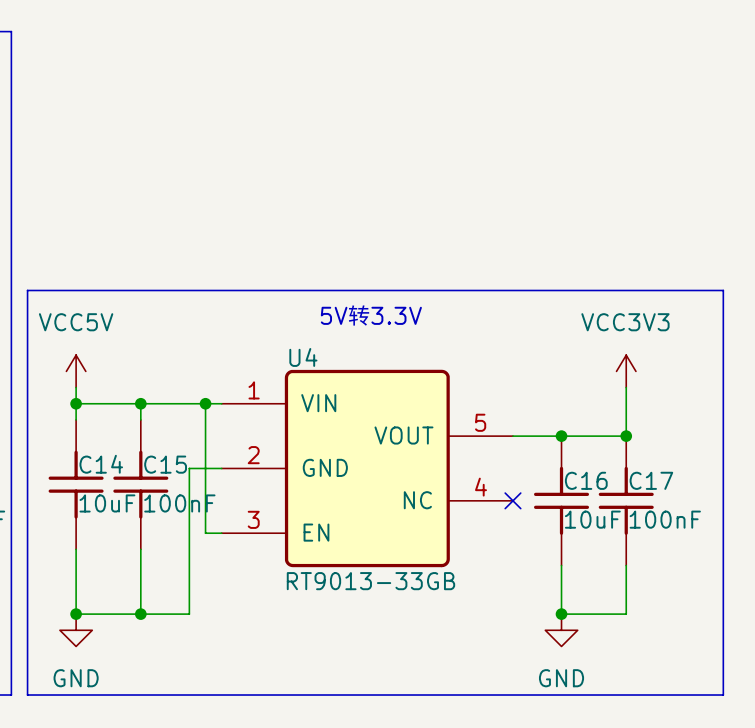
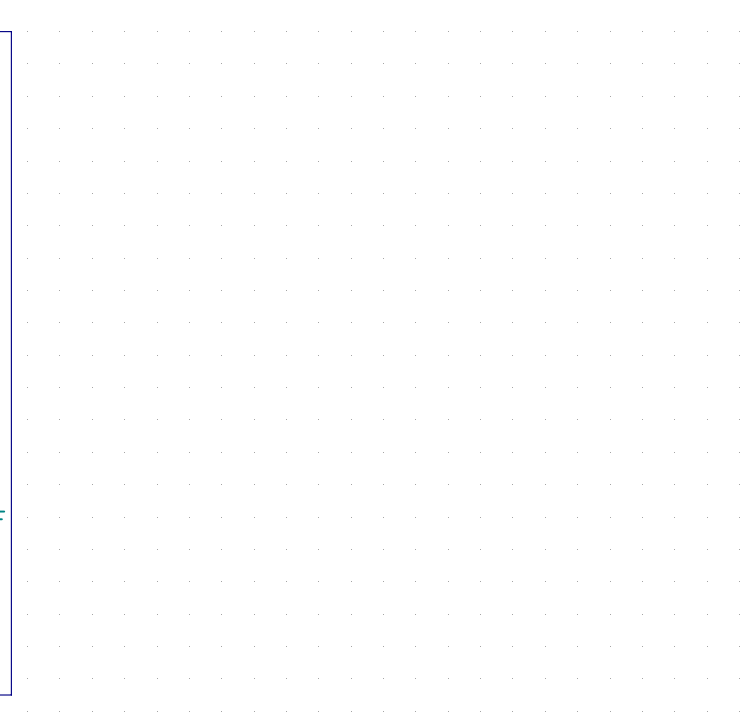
line: (27, 290) (723, 290) (723, 695) (27, 695) (27, 290) -> none
text: 5V转3.3V (371, 315) -> none
power symbol: VCC5V (76, 371) -> none
power symbol: VCC3V3 (626, 371) -> none
wire: (76, 387) (76, 419) -> none
wire: (626, 387) (626, 436) (512, 436) -> none
wire: (76, 403) (221, 403) -> none
junction: (76, 403) -> none
wire: (140, 403) (140, 419) -> none
junction: (140, 403) -> none
wire: (205, 403) (205, 533) (221, 533) -> none
junction: (205, 403) -> none
junction: (561, 436) -> none
junction: (626, 436) -> none
wire: (221, 468) (189, 468) (189, 614) (76, 614) (76, 549) -> none
U4: RT9013-33GB (367, 468) -> none
C14: 10uF (76, 484) -> none
C15: 100nF (140, 484) -> none
no-connect mark: (512, 500) -> none
C16: 10uF (561, 500) -> none
C17: 100nF (626, 500) -> none
wire: (140, 549) (140, 614) -> none
wire: (561, 565) (561, 614) (626, 614) (626, 565) -> none
junction: (76, 614) -> none
junction: (140, 614) -> none
junction: (561, 614) -> none
power symbol: GND (76, 630) -> none
power symbol: GND (561, 630) -> none

